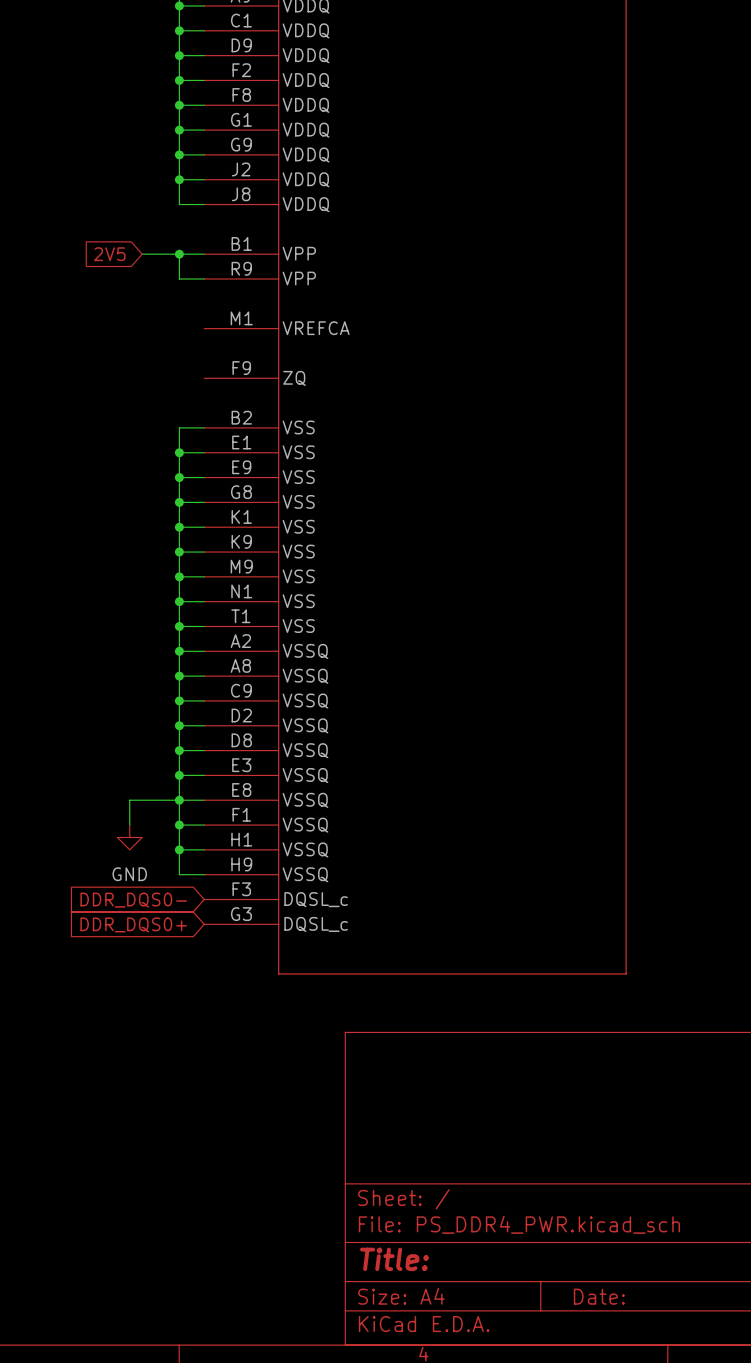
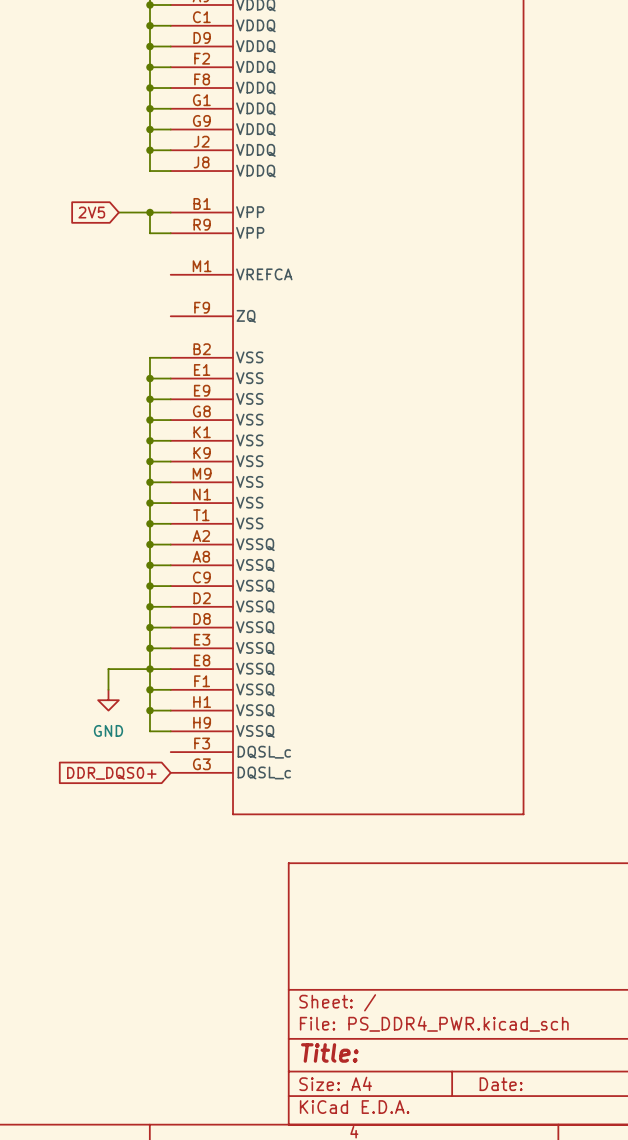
global label: DDR_DQS0- (133, 900) -> none

